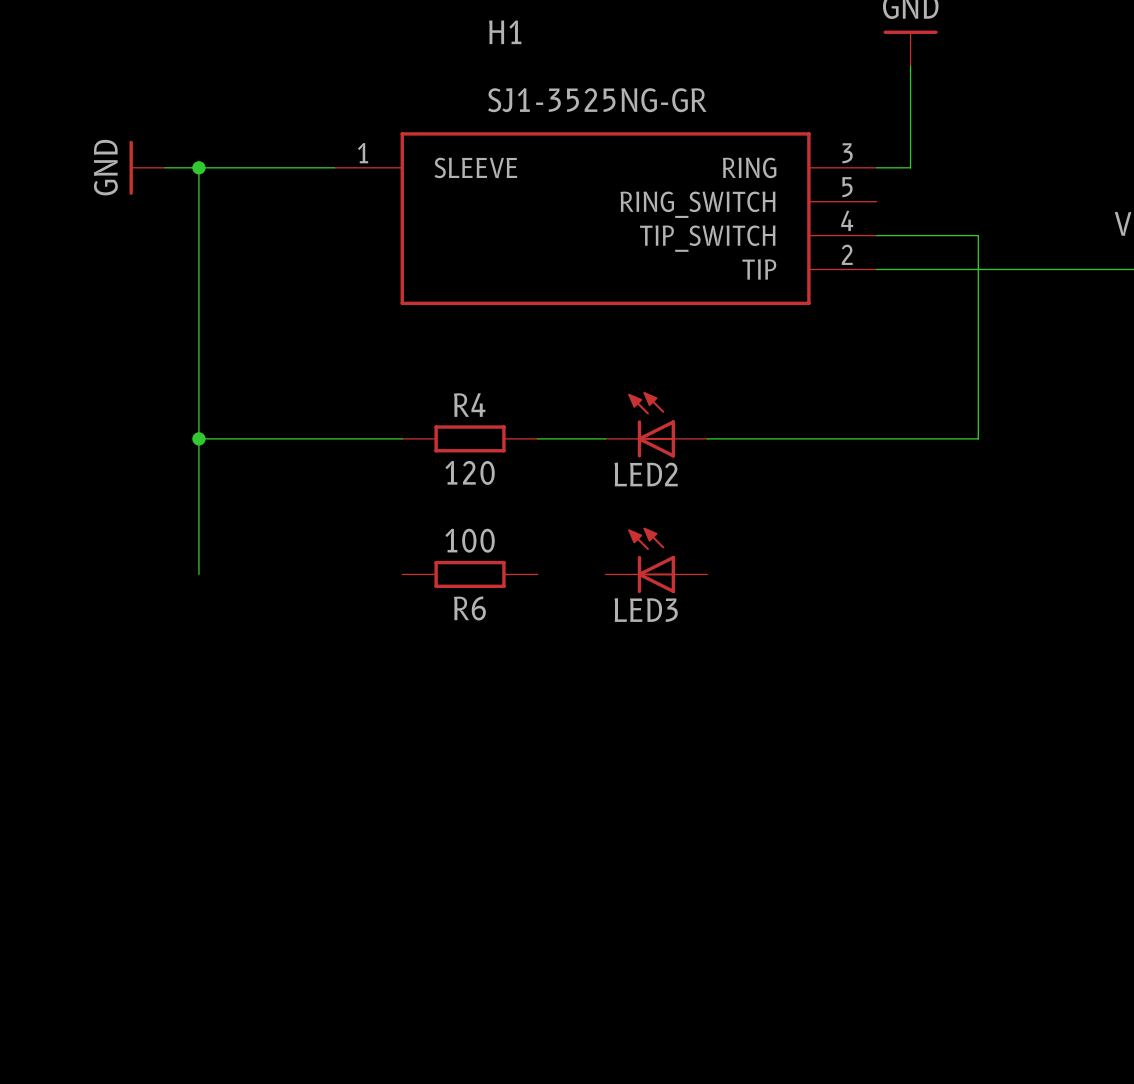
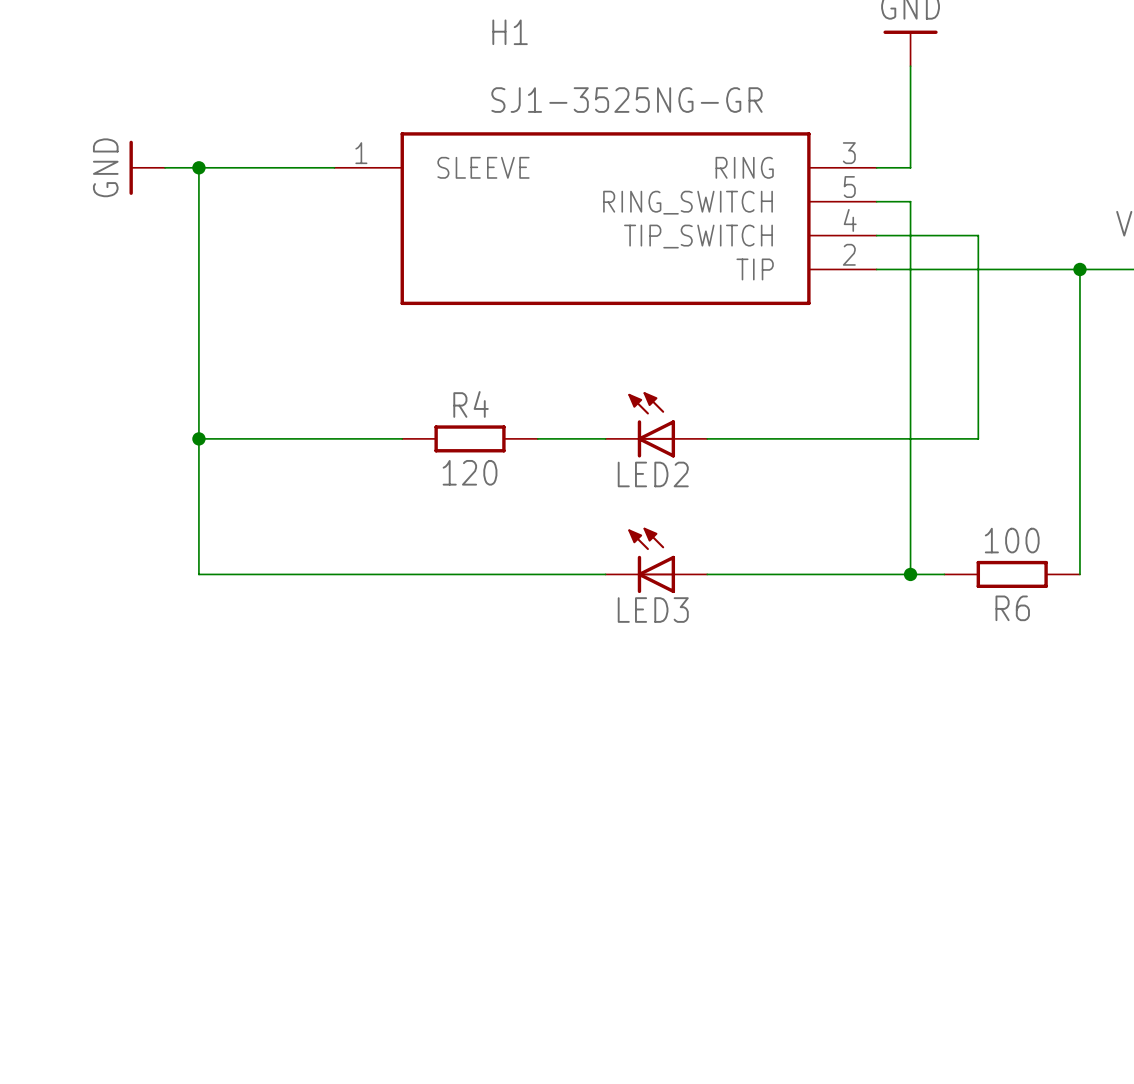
wire: none -> (876, 201) (910, 201) (910, 574)
wire: none -> (1079, 269) (1079, 574)
junction: none -> (1079, 269)
wire: none -> (198, 574) (605, 574)
R6 position: (470, 574) -> (1012, 574)
wire: none -> (707, 574) (944, 574)
junction: none -> (910, 574)

